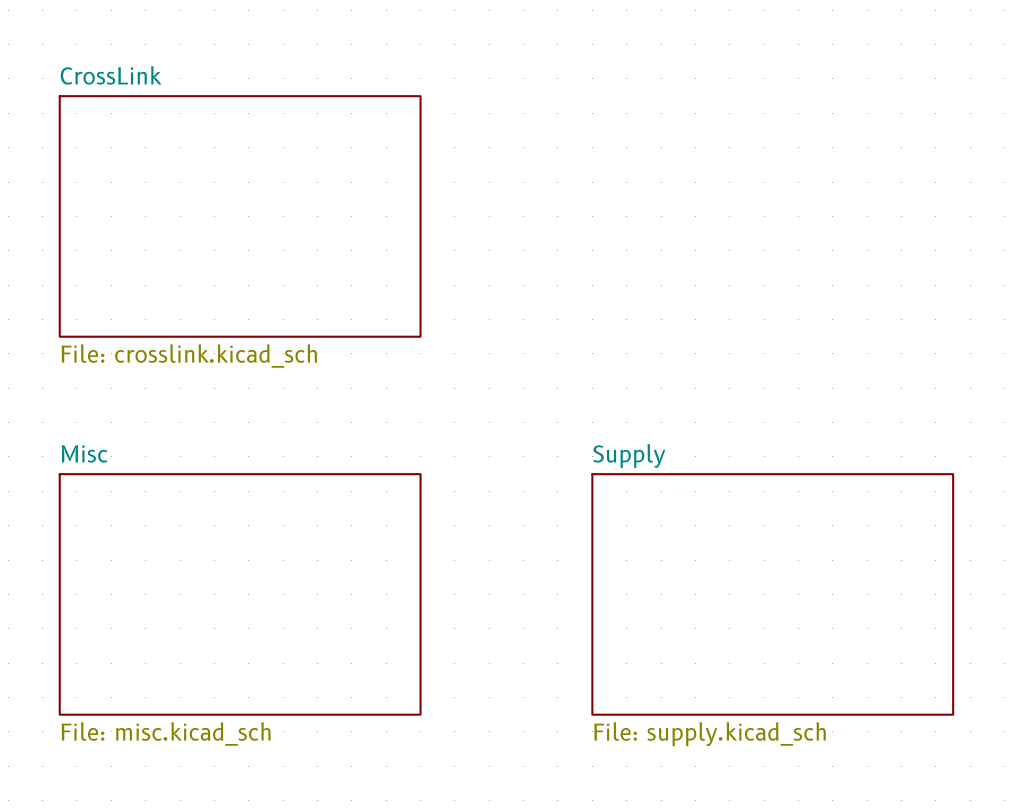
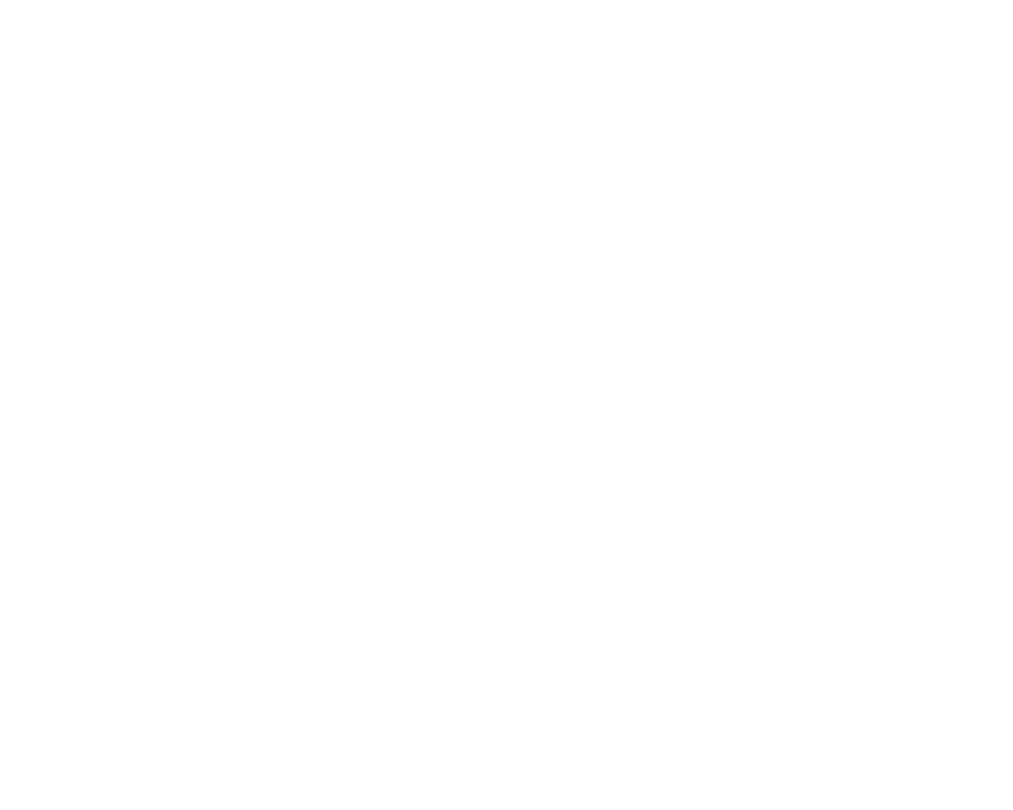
sheet CrossLink: File: crosslink.kicad_sch (240, 216) -> none
sheet Misc: File: misc.kicad_sch (240, 594) -> none
sheet Supply: File: supply.kicad_sch (772, 594) -> none

